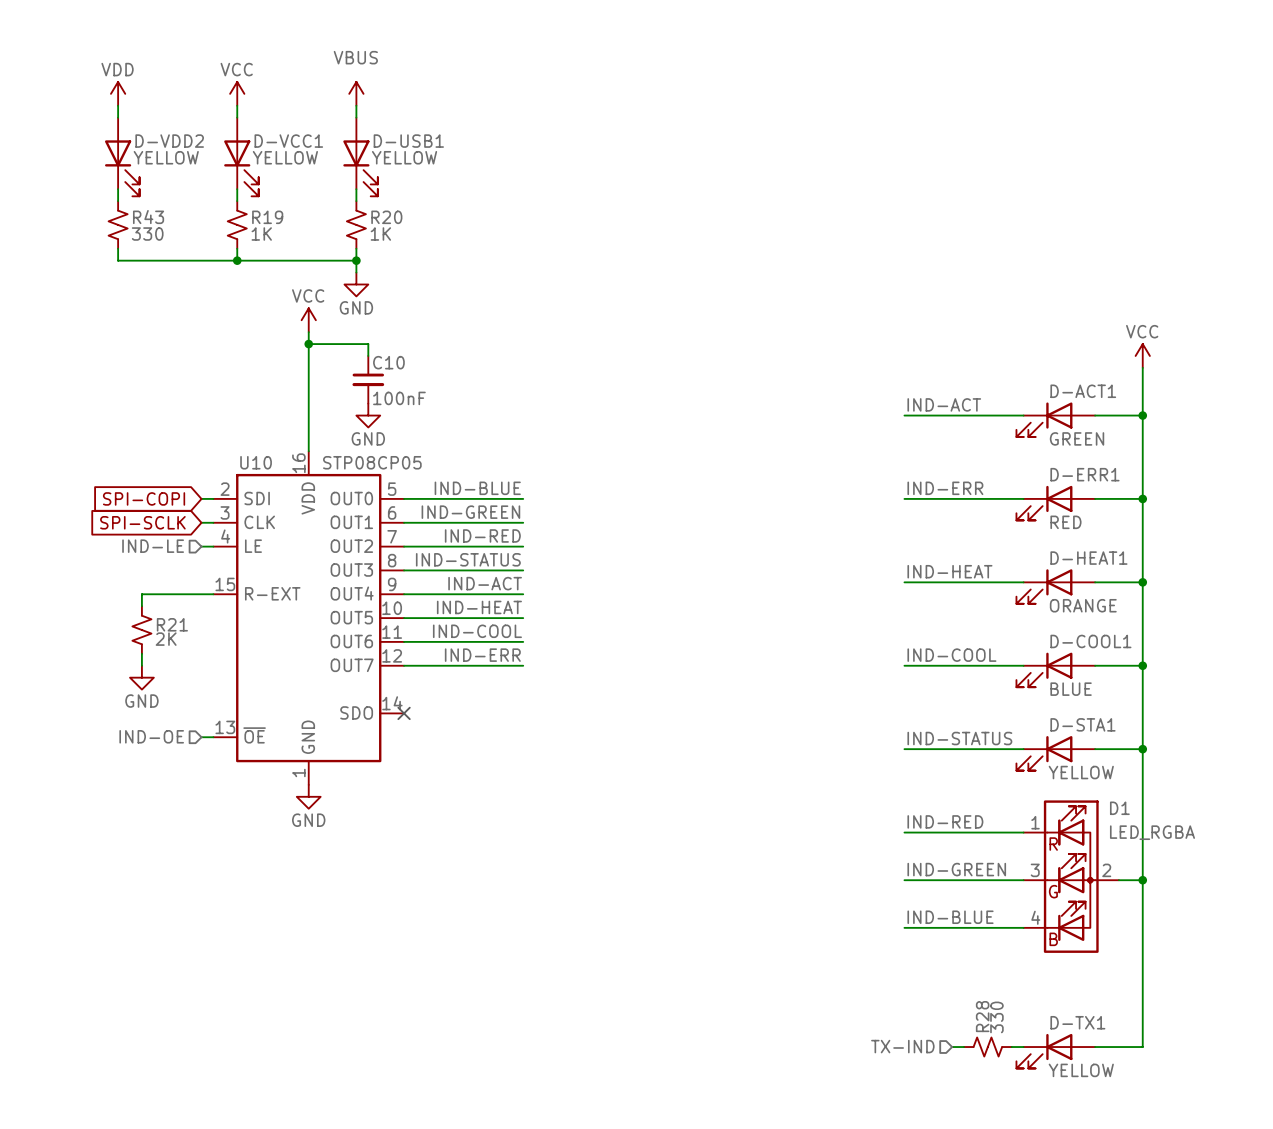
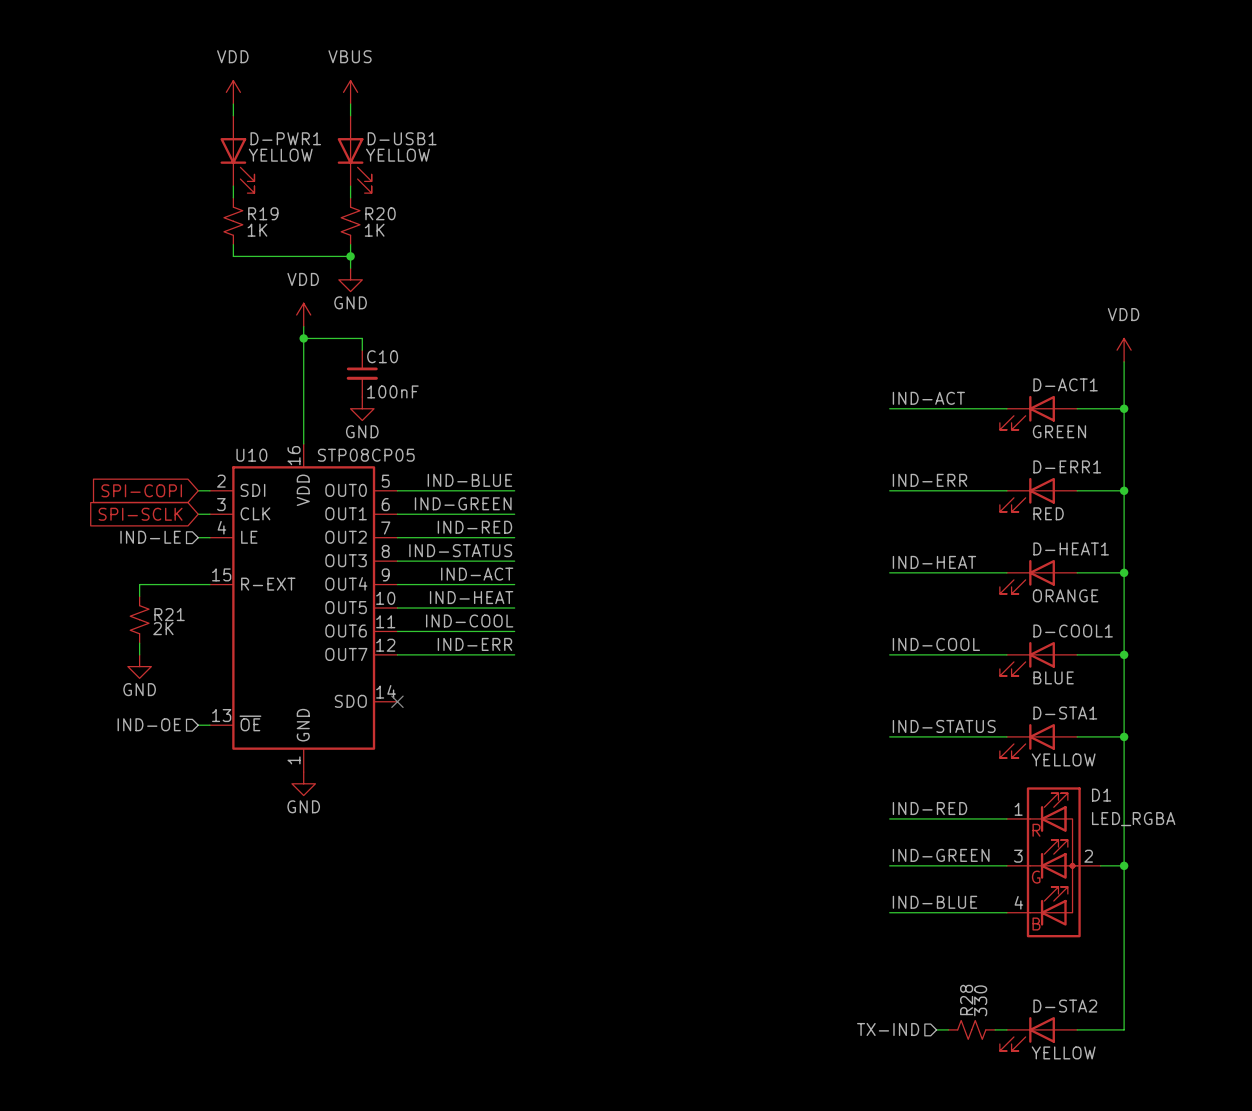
power symbol: VDD (118, 93) -> none
power symbol: VCC (237, 93) -> VDD (233, 92)
wire: (118, 105) (118, 117) -> none
D-VCC1 name: D-VCC1 (288, 141) -> D-PWR1 (285, 138)
D-VDD2: YELLOW (122, 157) -> none
wire: (118, 189) (118, 201) -> none
R43: 330 (118, 224) -> none
wire: (118, 248) (118, 260) (237, 260) -> none
junction: (237, 260) -> none
power symbol: VCC (308, 320) -> VDD (303, 315)
power symbol: VCC (1142, 355) -> VDD (1124, 350)
D-TX1 name: D-TX1 (1077, 1022) -> D-STA2 (1065, 1006)

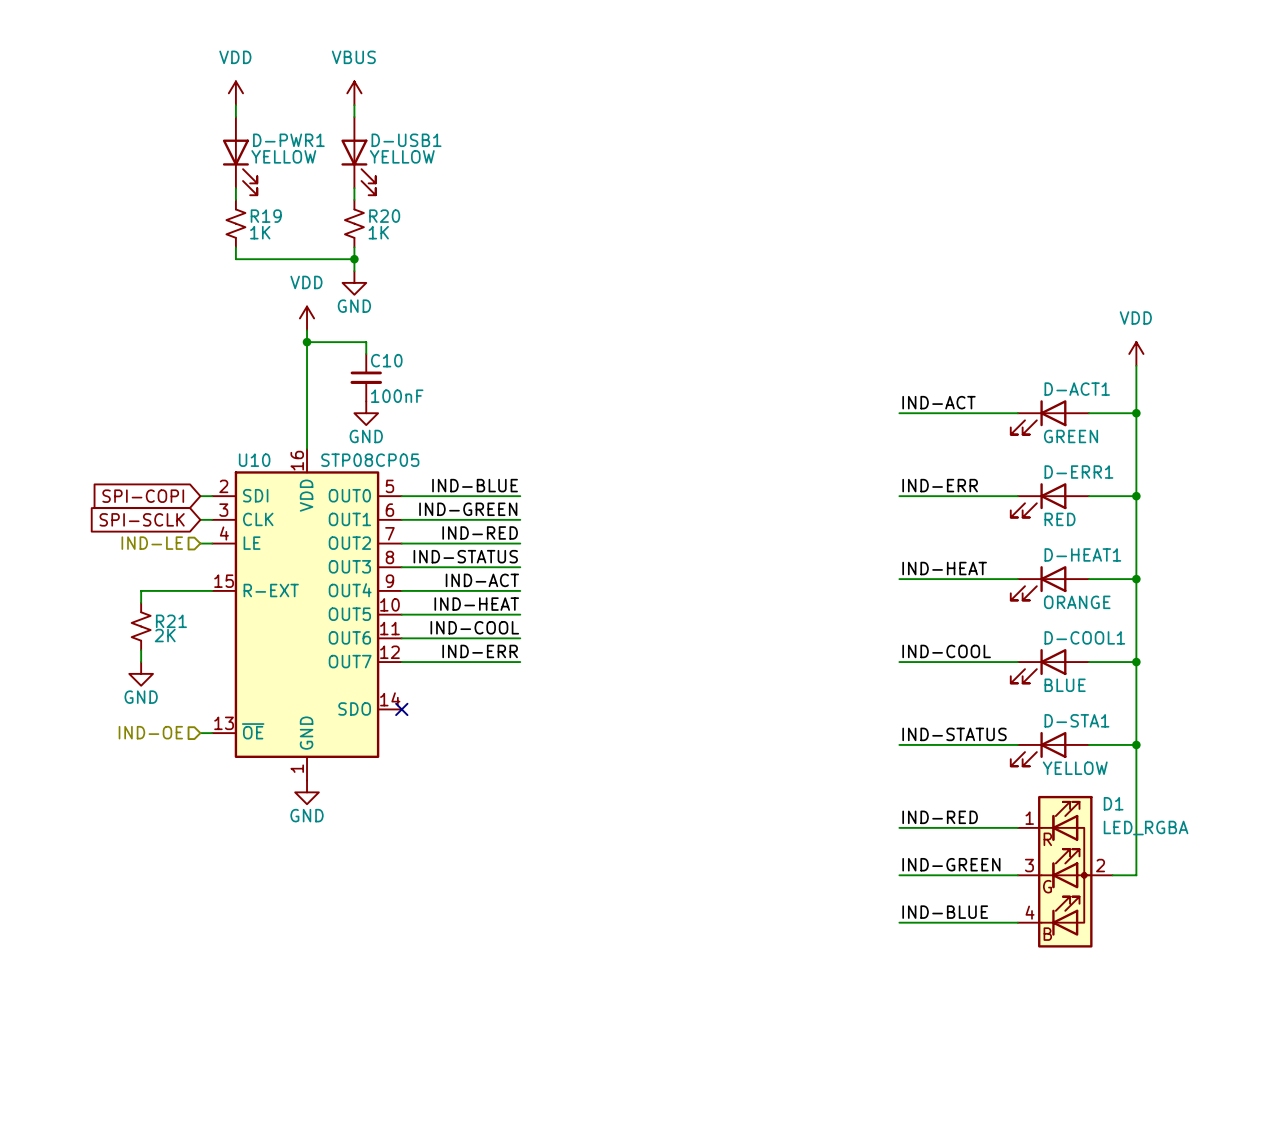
wire: (1124, 865) (1124, 1029) (1077, 1029) -> none
junction: (1124, 865) -> none
hierarchical label: TX-IND (888, 1029) -> none
wire: (936, 1029) (948, 1029) -> none
R28: 330 (971, 1029) -> none
wire: (995, 1029) (1006, 1029) -> none
D-STA2: YELLOW (1038, 1034) -> none

